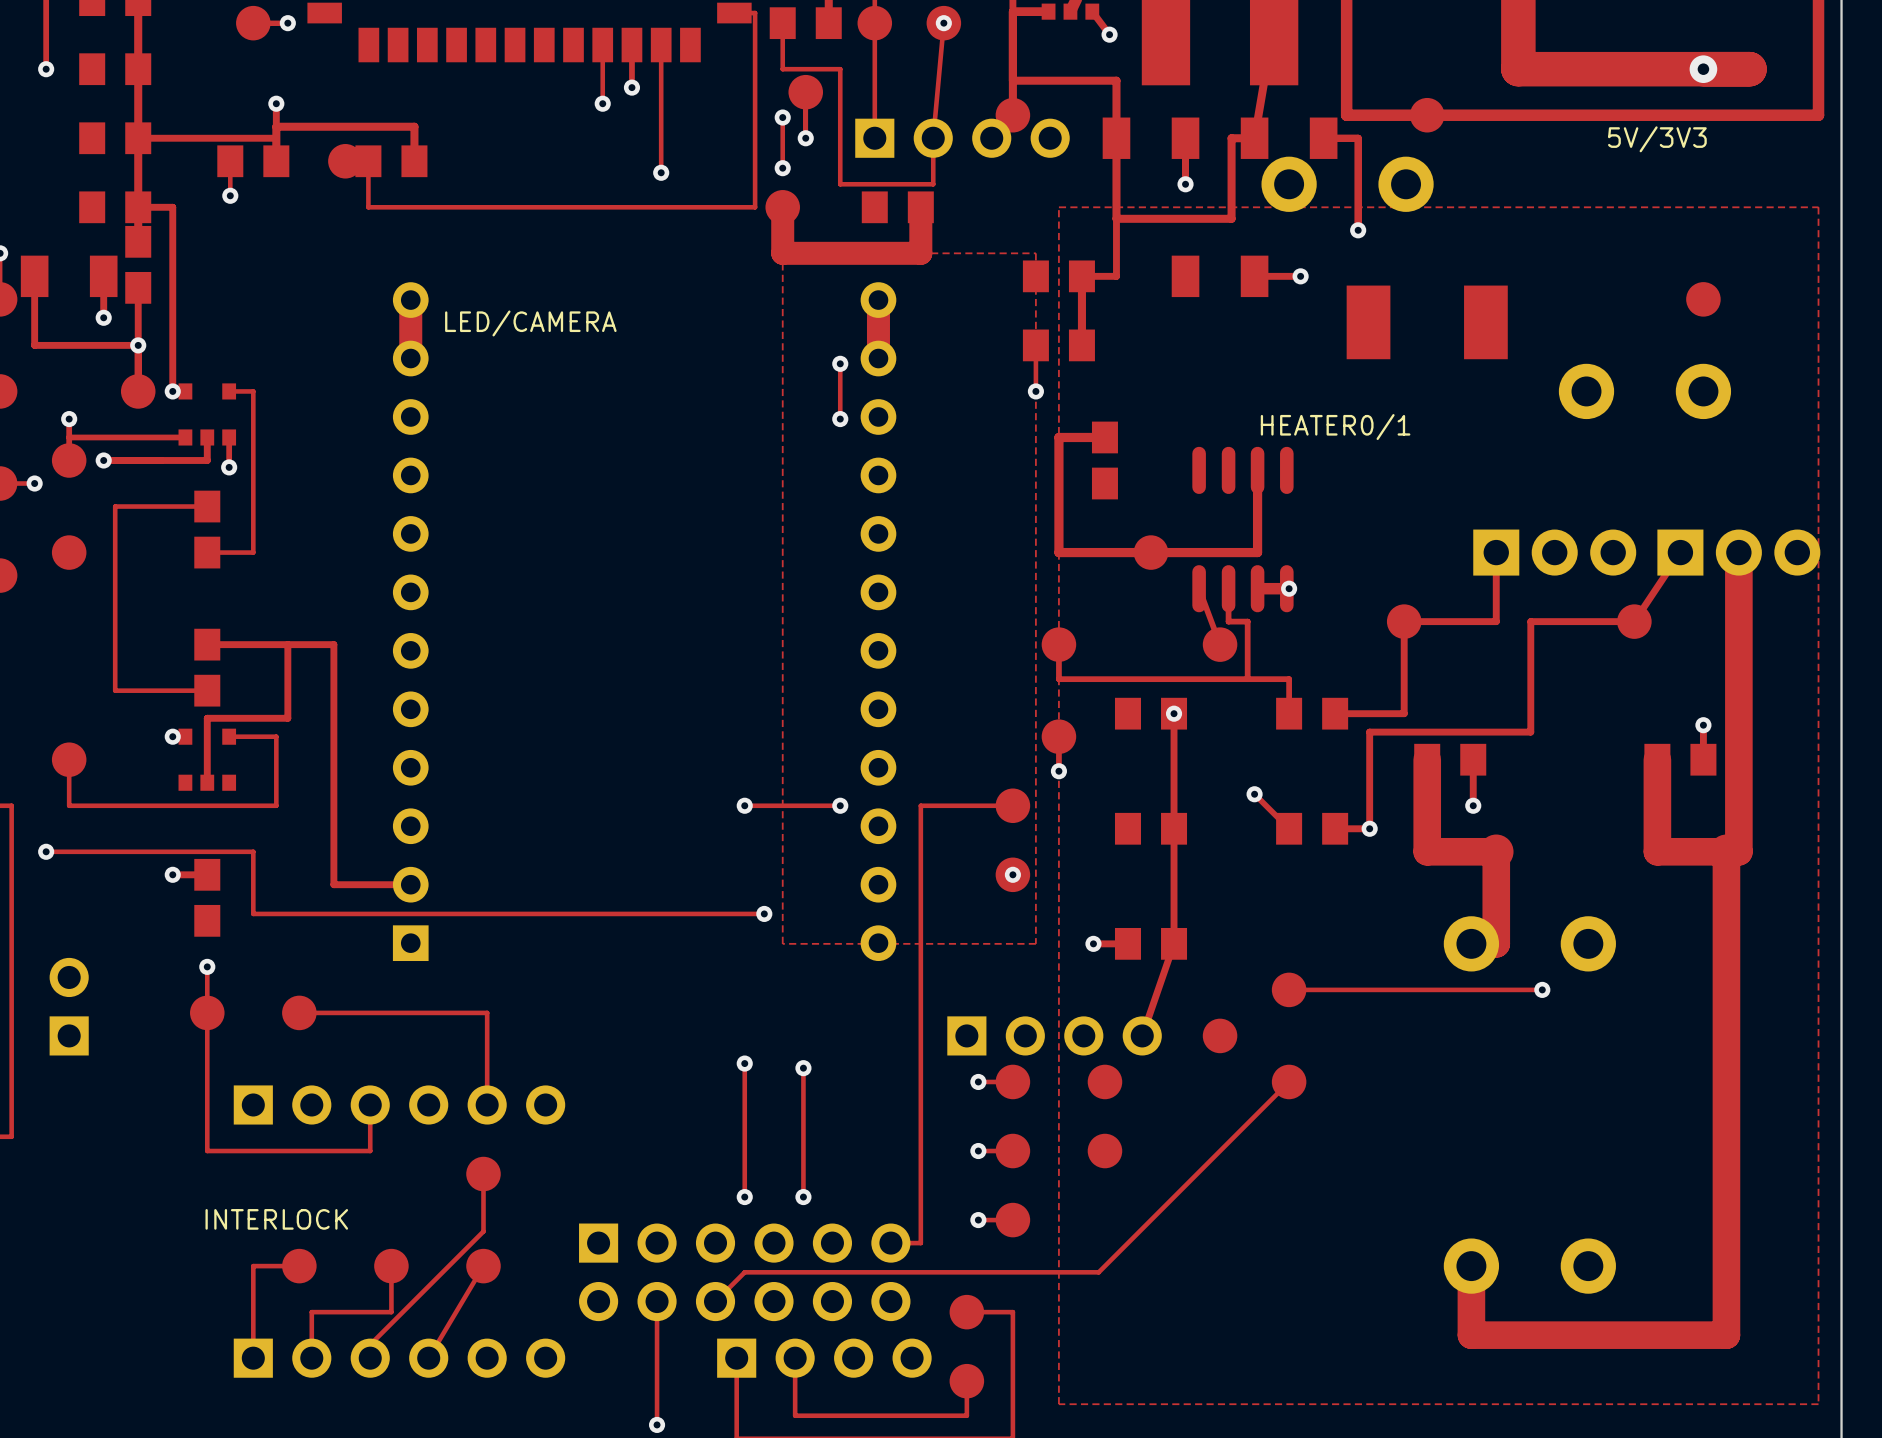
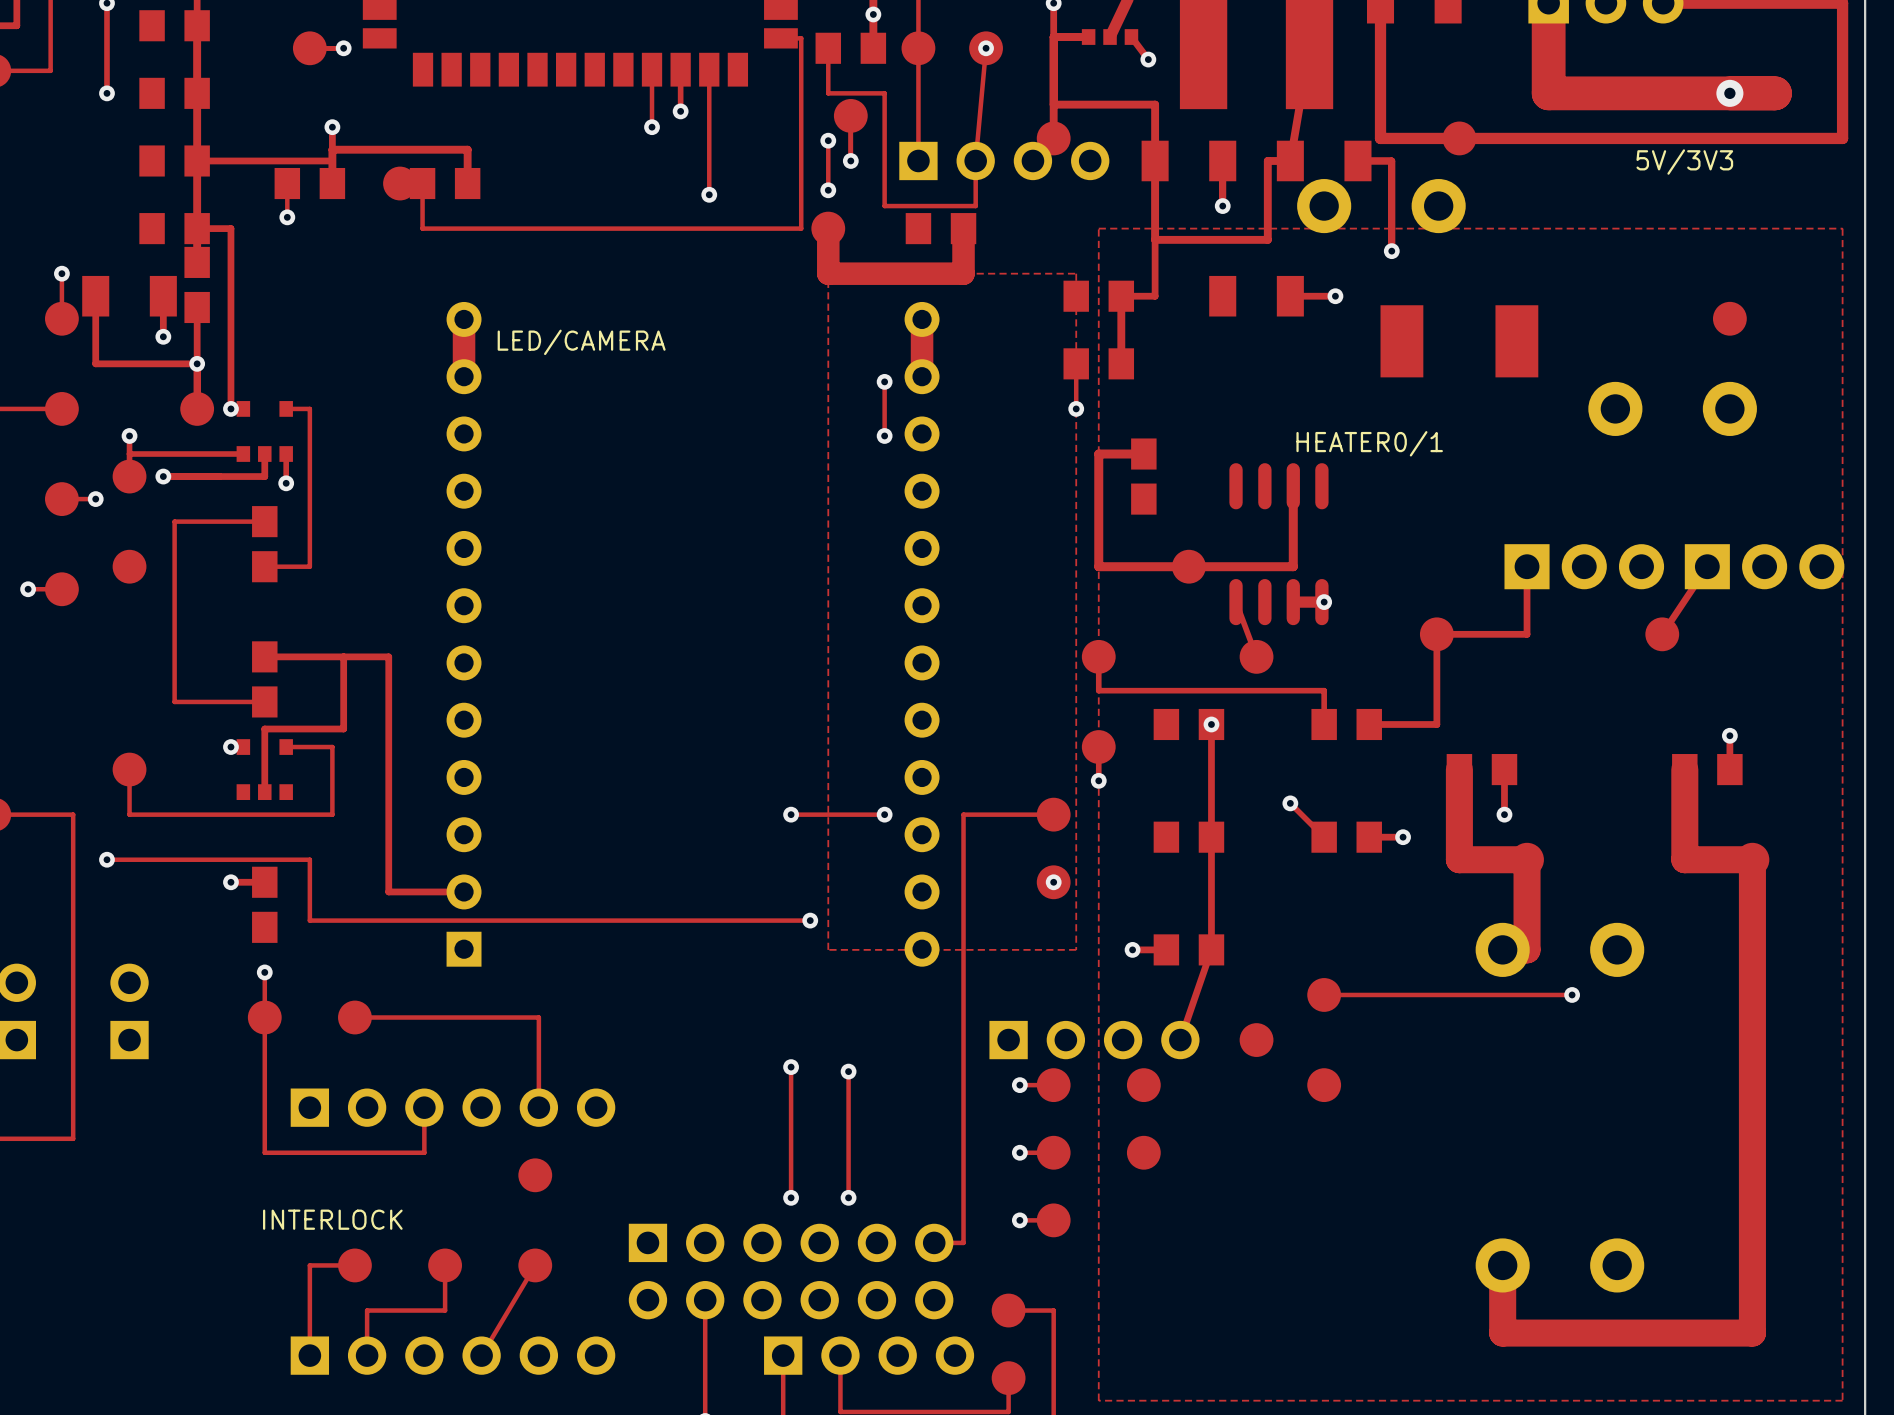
track: (1738, 552) (1738, 851) (1726, 851) -> none
track: (1228, 588) (1228, 621) (1247, 621) (1247, 679) -> none
track: (1634, 621) (1530, 621) (1530, 732) (1369, 732) (1369, 828) -> none
track: (1289, 1081) (1098, 1272) (744, 1272) (715, 1301) -> none
track: (483, 1174) (483, 1231) (370, 1344) (370, 1358) -> none

